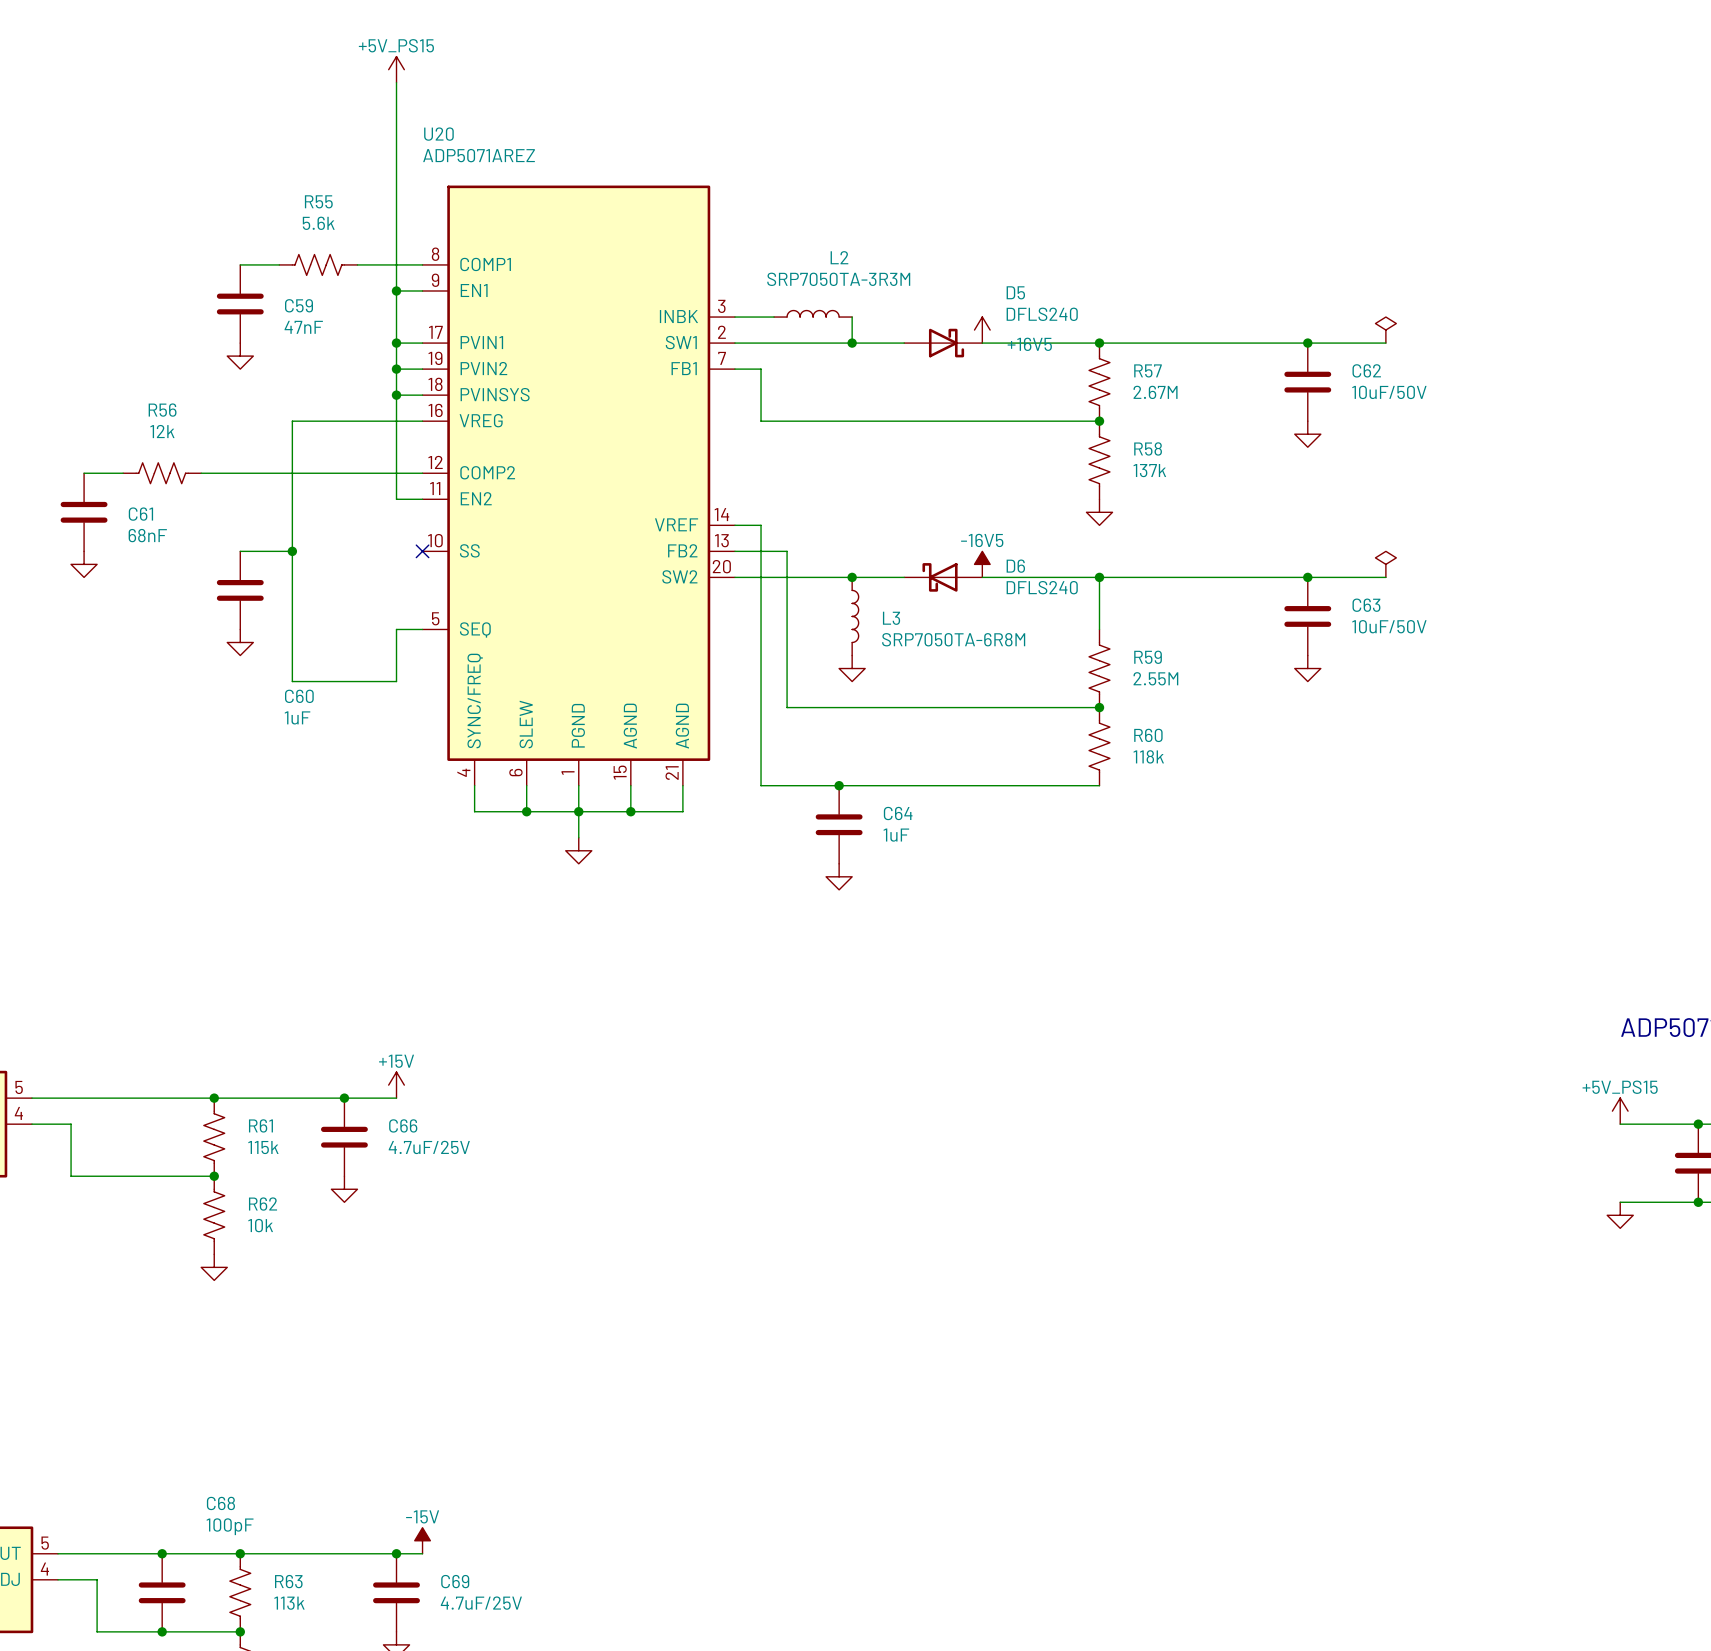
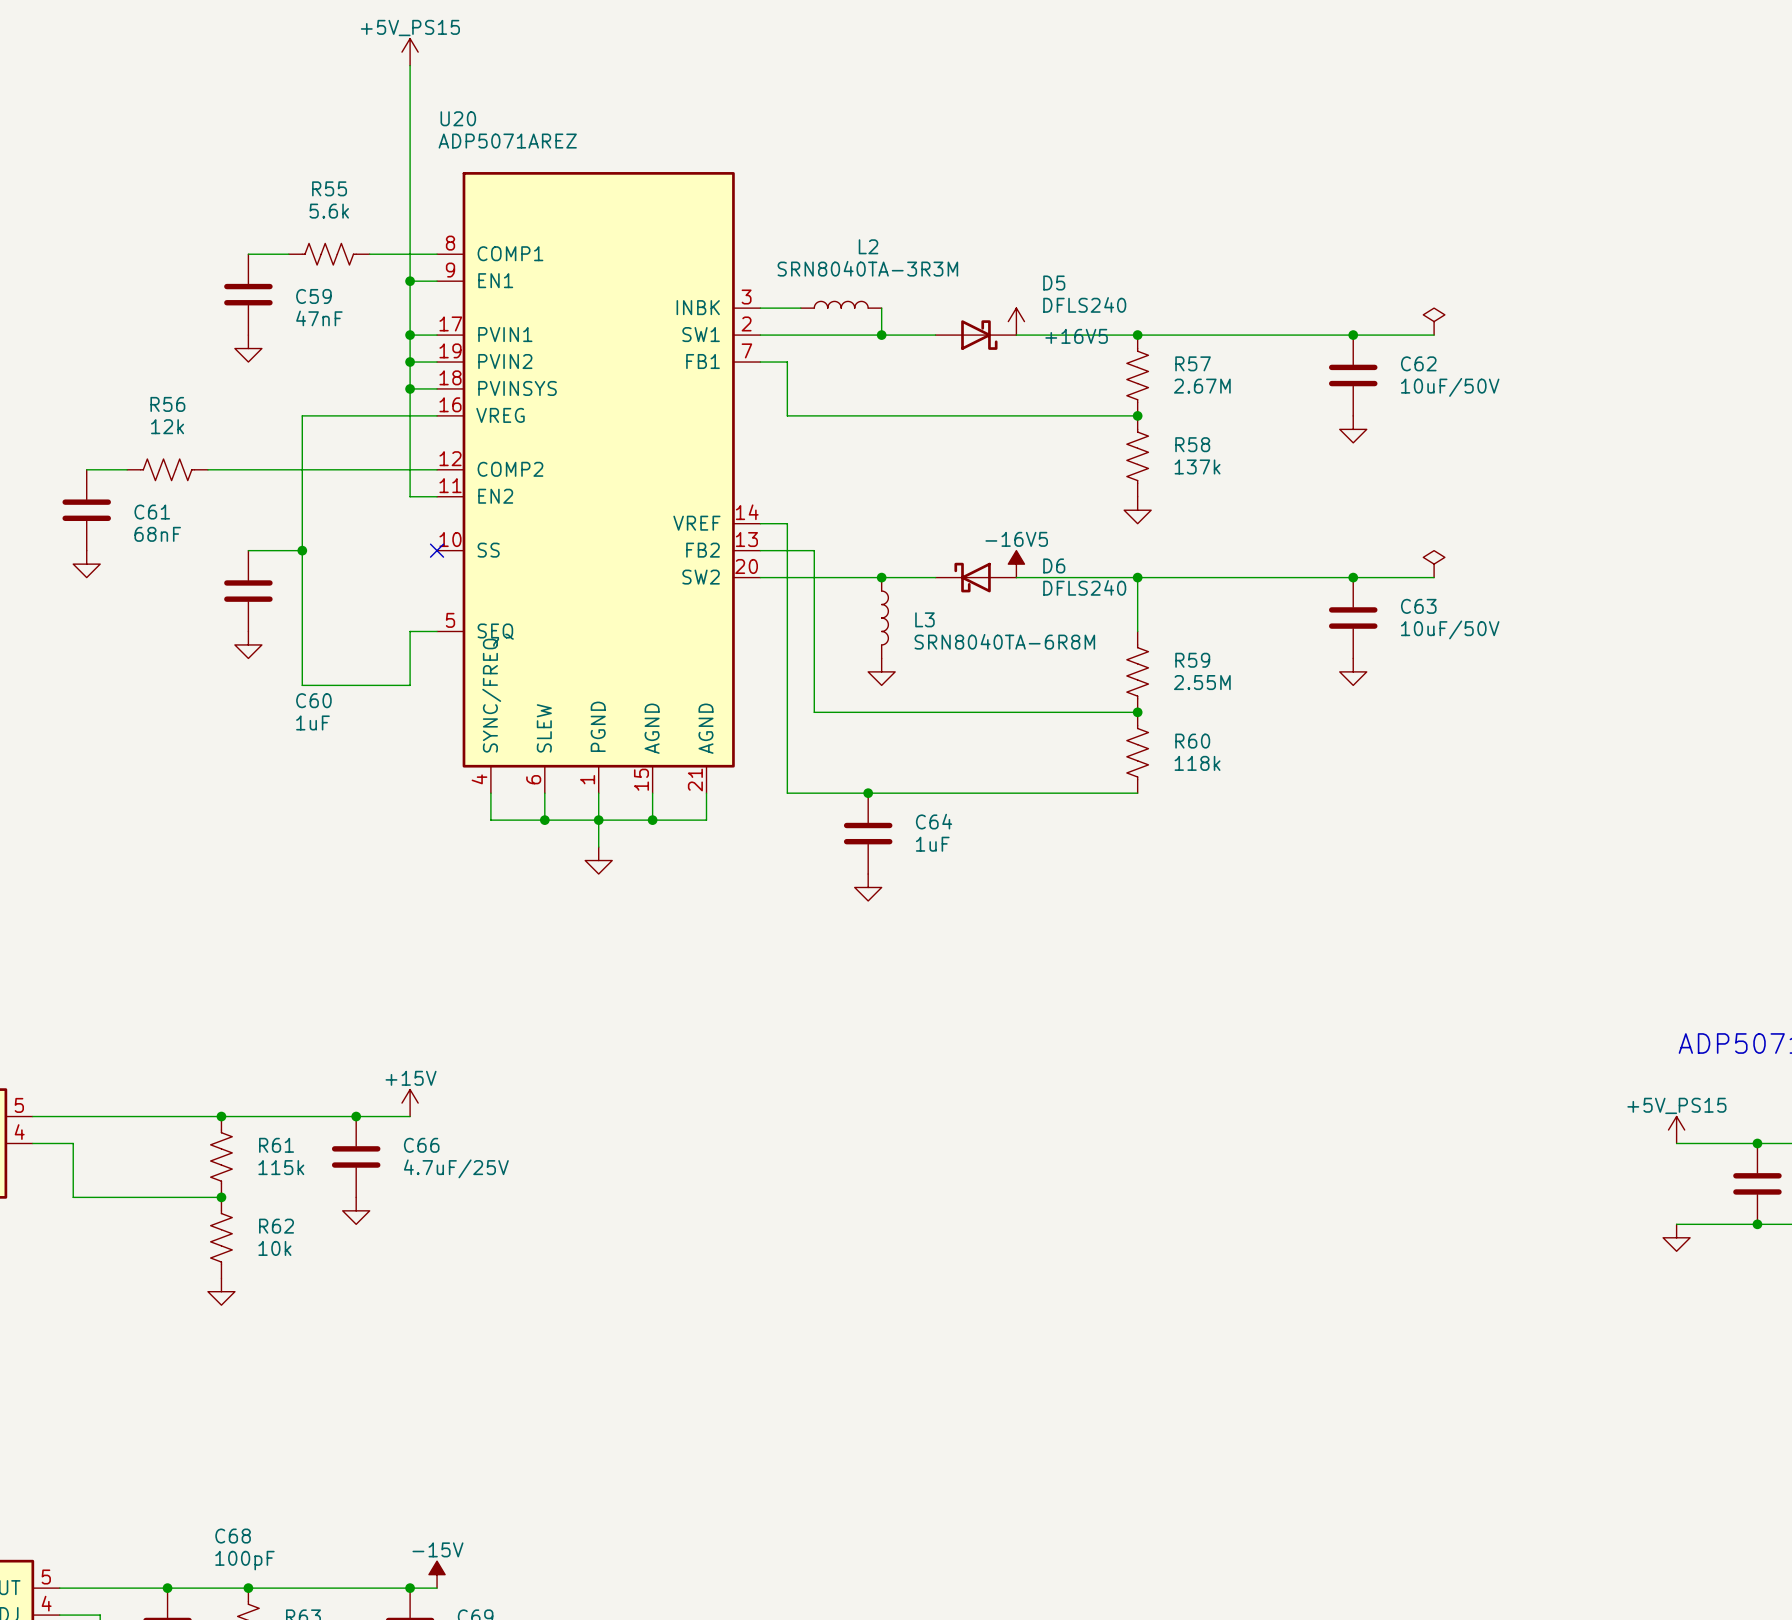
L2 value: SRP7050TA-3R3M (838, 279) -> SRN8040TA-3R3M (867, 268)
L3 value: SRP7050TA-6R8M (953, 639) -> SRN8040TA-6R8M (1004, 641)

